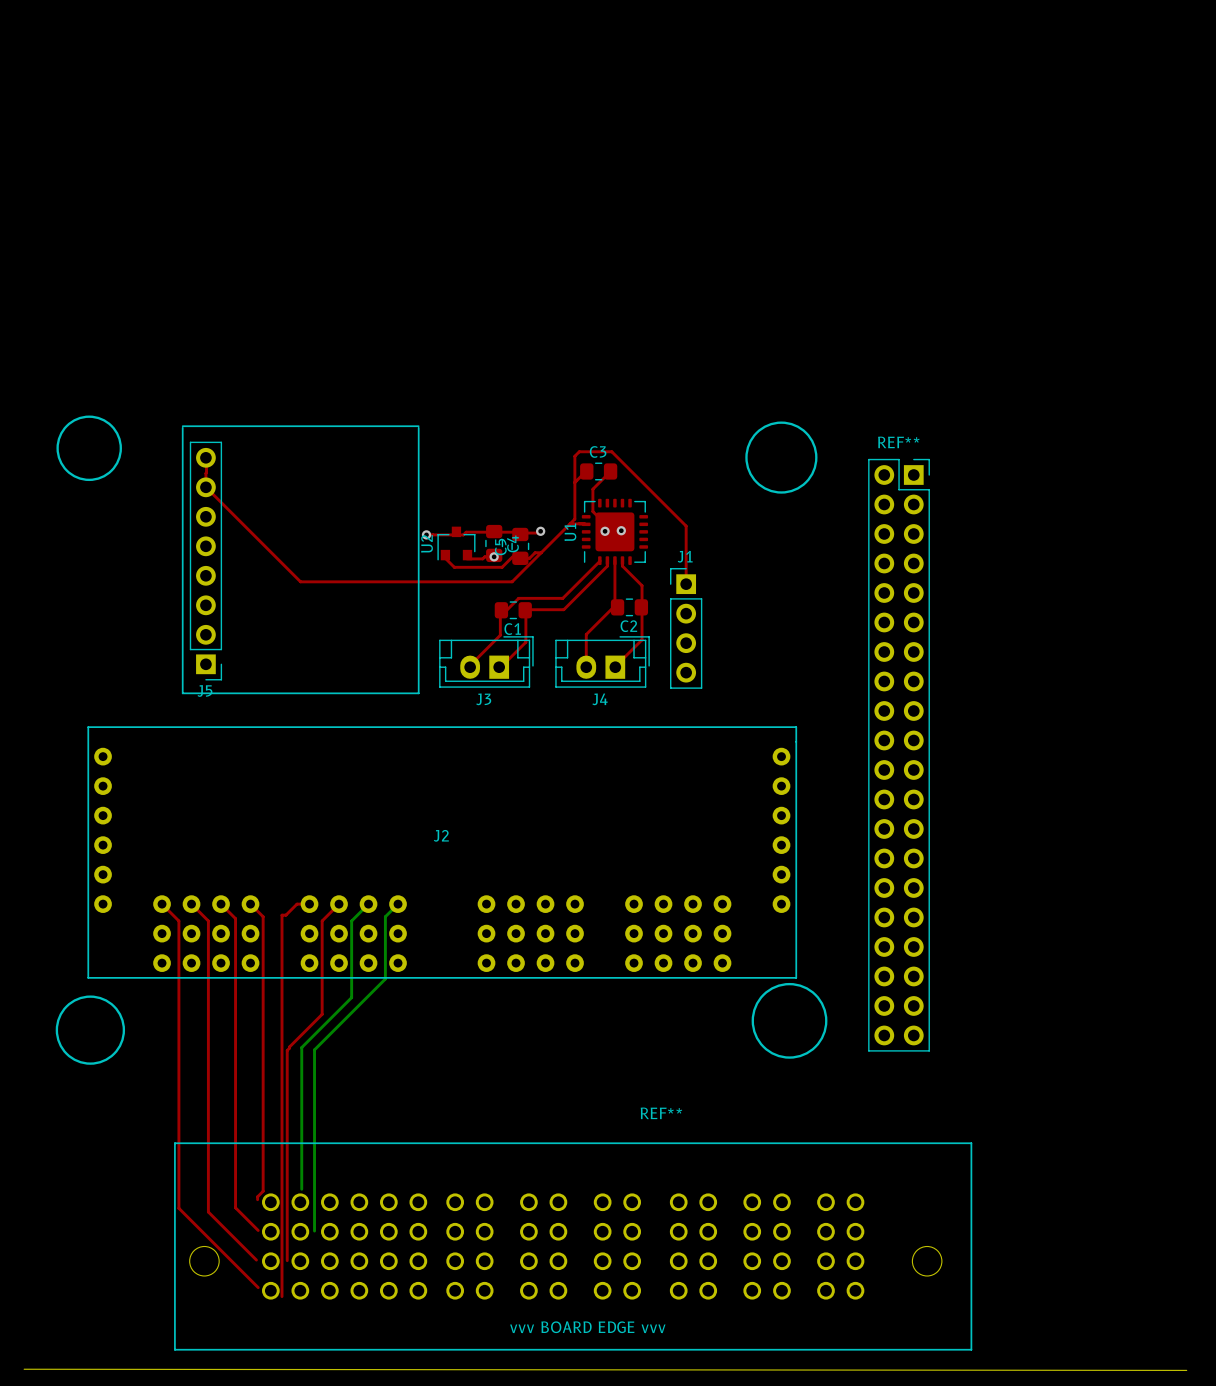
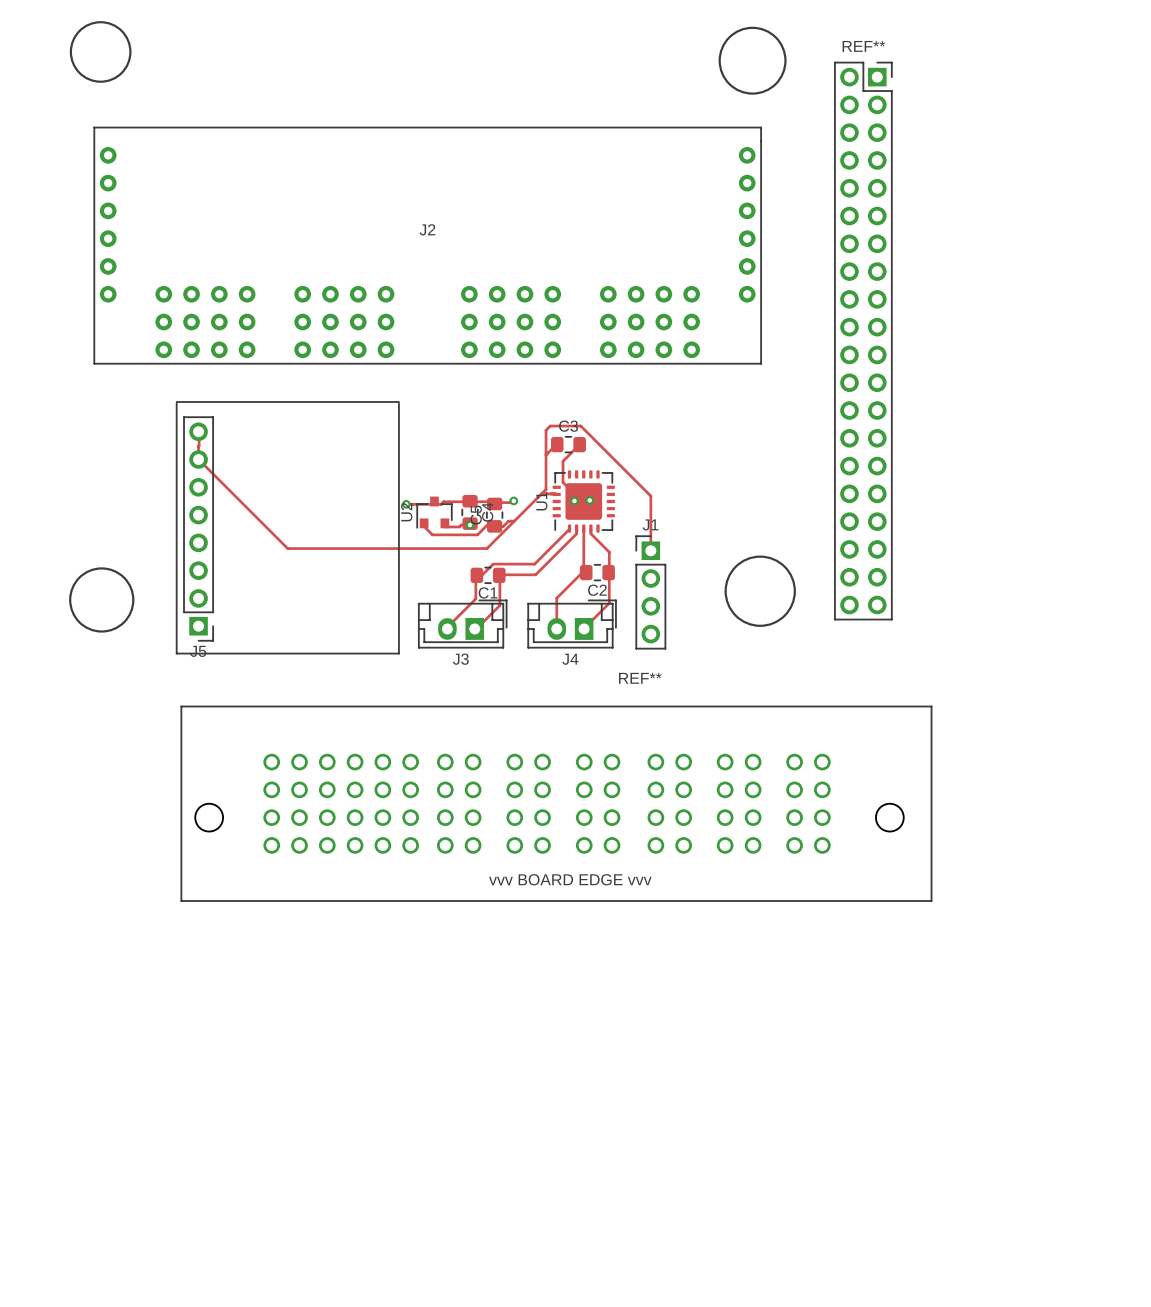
drawing: none -> [69, 21, 132, 83]
drawing: none -> [718, 26, 787, 95]
REF**: none -> (863, 341)
drawing: [56, 415, 122, 482] -> none
drawing: [745, 421, 818, 494] -> none
drawing: none -> [724, 555, 796, 627]
drawing: none -> [69, 567, 135, 633]
REF**: (899, 755) -> none
J2 position: (442, 852) -> (427, 245)
REF**: none -> (556, 803)
top track: (162, 904) (178, 920) (178, 1208) (258, 1287) -> none
top track: (191, 904) (208, 920) (208, 1212) (256, 1260) -> none
top track: (221, 904) (235, 918) (235, 1207) (258, 1230) -> none
top track: (250, 904) (263, 916) (263, 1191) (257, 1196) (257, 1199) -> none
top track: (309, 904) (297, 904) (285, 915) (282, 915) (282, 1296) -> none
top track: (339, 904) (322, 920) (322, 1014) (287, 1050) (287, 1260) -> none
bottom track: (368, 904) (351, 920) (351, 997) (301, 1047) (301, 1189) -> none
bottom track: (398, 904) (385, 916) (385, 978) (314, 1049) (314, 1231) -> none
drawing: [751, 982, 828, 1059] -> none
drawing: [55, 995, 126, 1065] -> none
REF**: (573, 1246) -> none
board edge: (24, 1369) (1186, 1370) -> none

